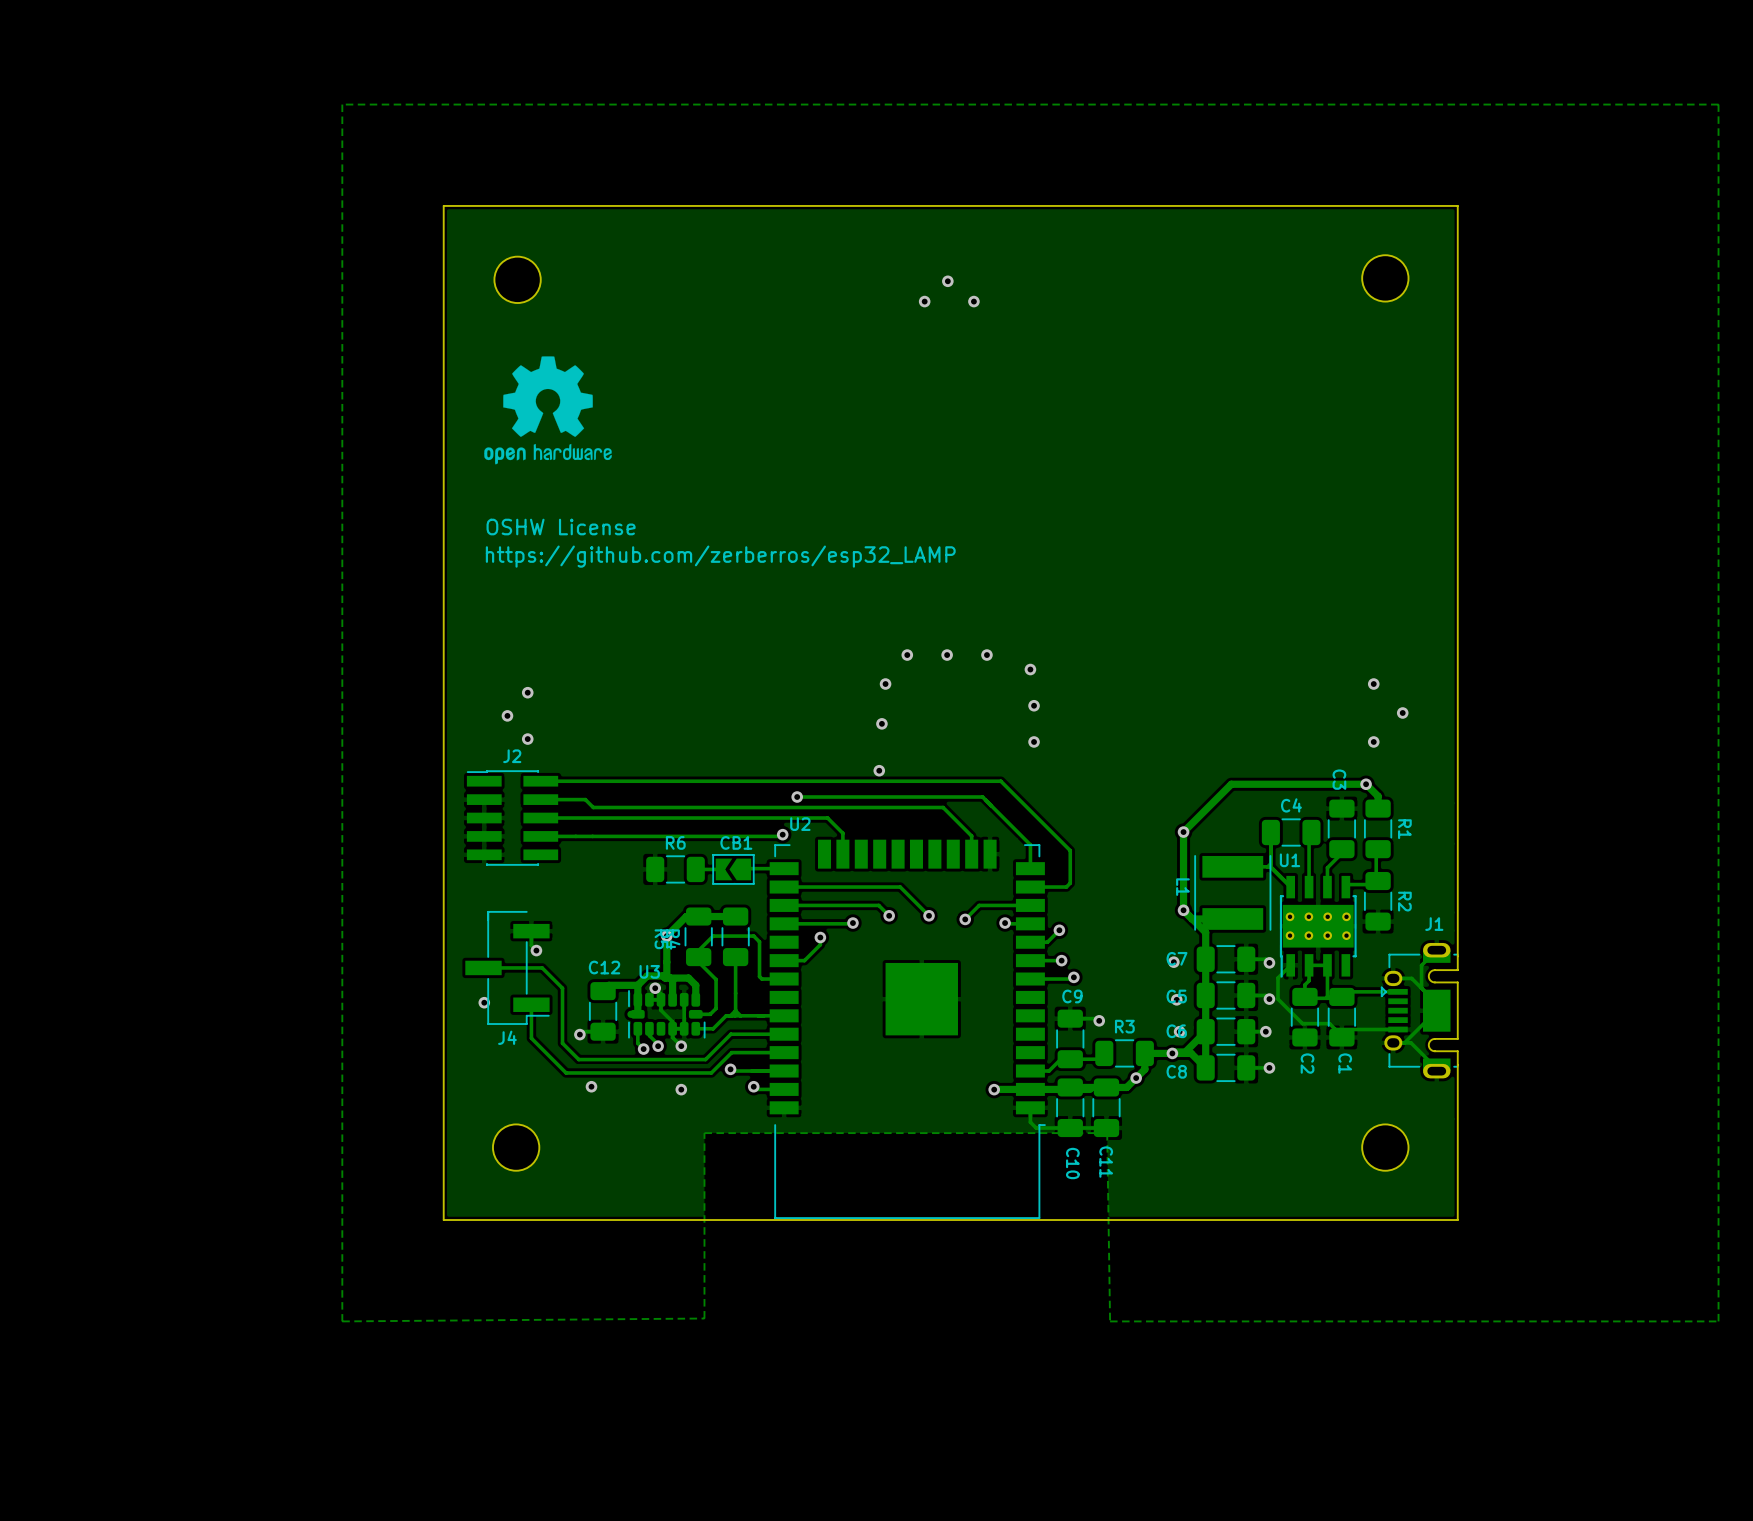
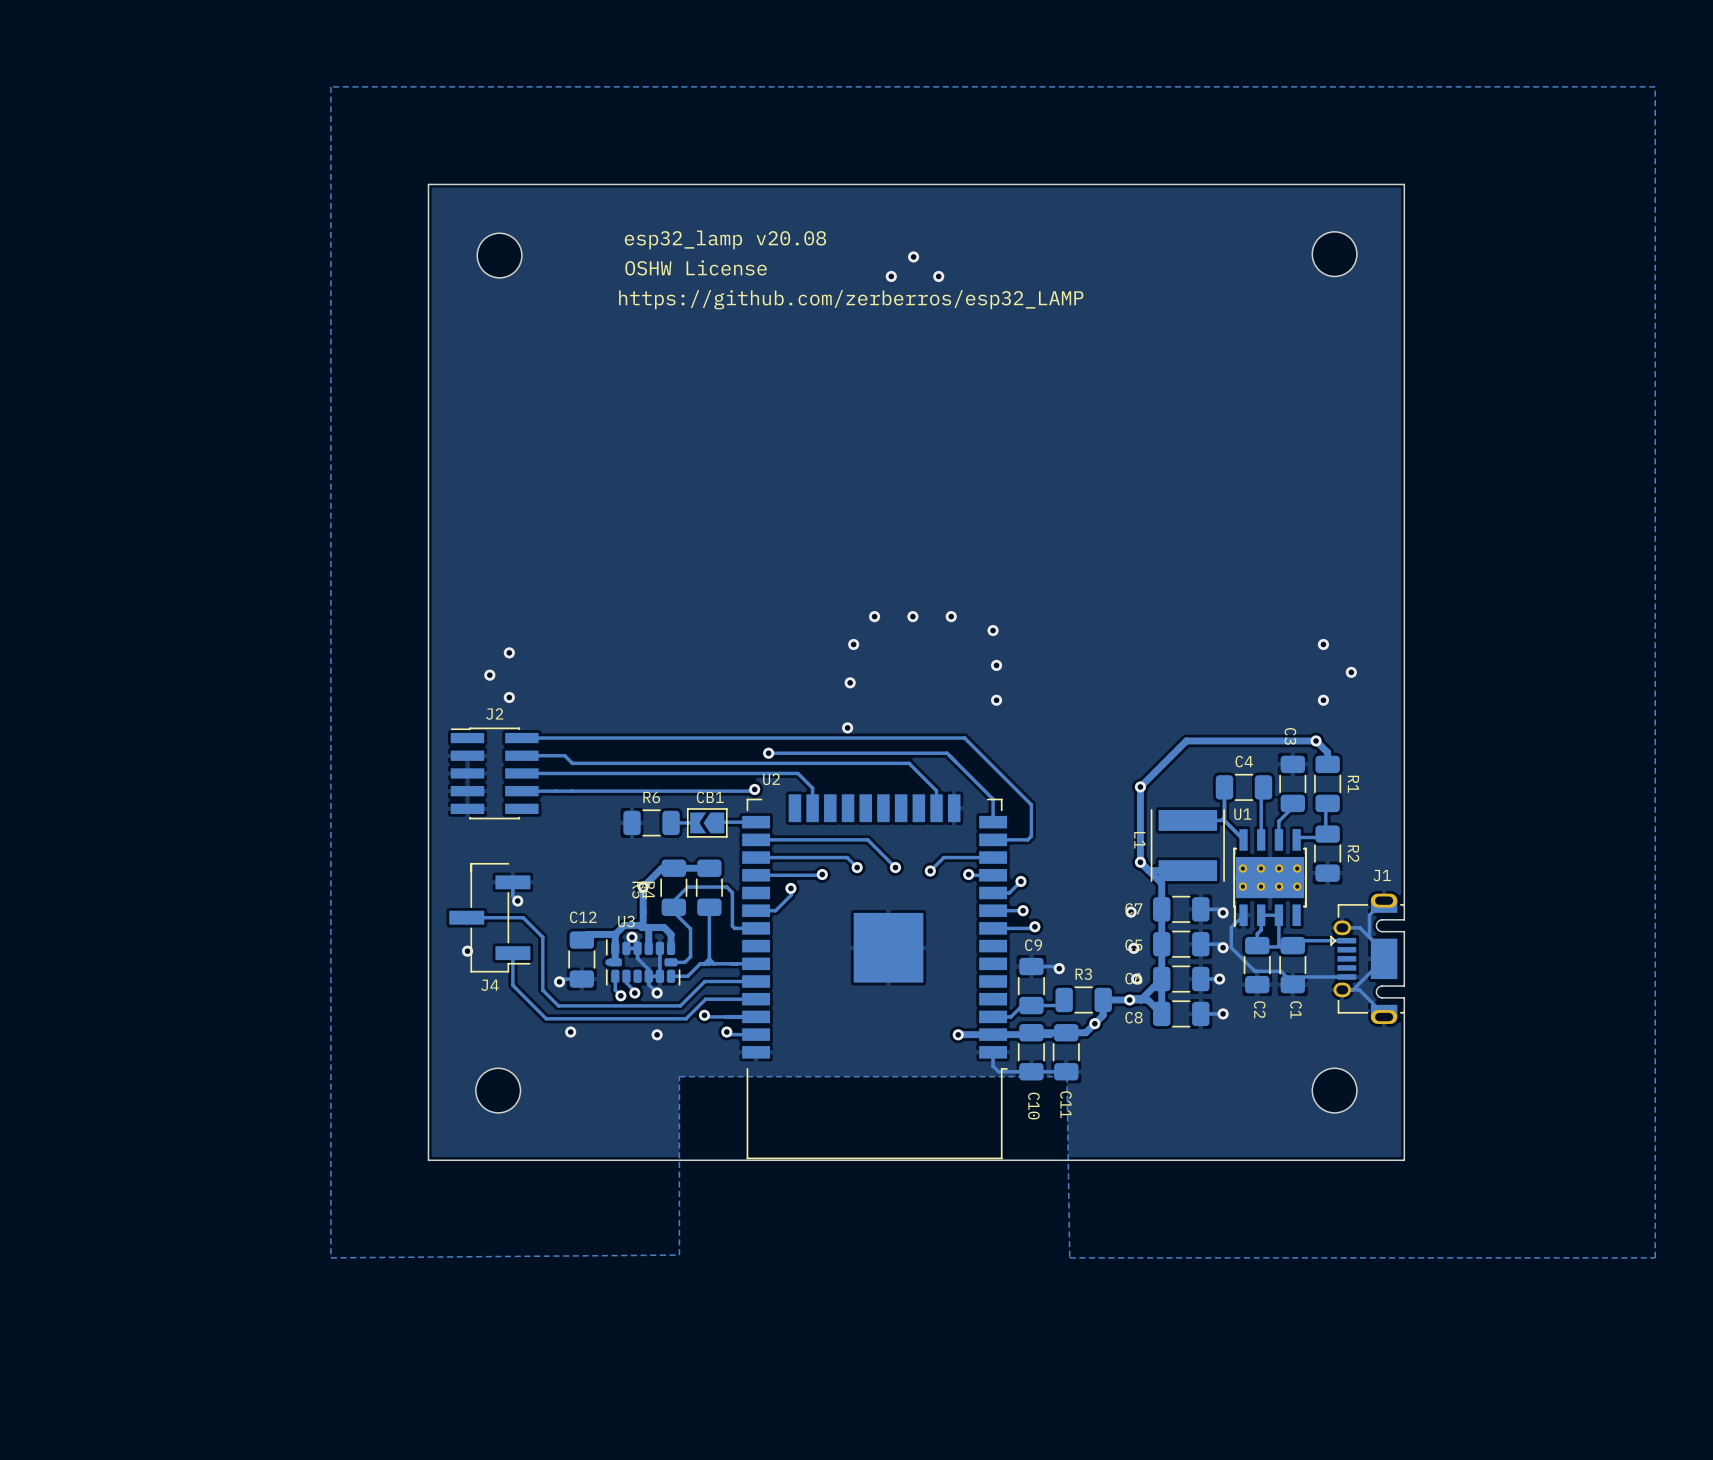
text: none -> esp32_lamp v20.08 (725, 239)
drawing: [484, 356, 612, 465] -> none
text position: OSHW License (561, 527) -> OSHW License (696, 267)
text position: https://github.com/zerberros/esp32_LAMP (720, 556) -> https://github.com/zerberros/esp32_LAMP (851, 299)

